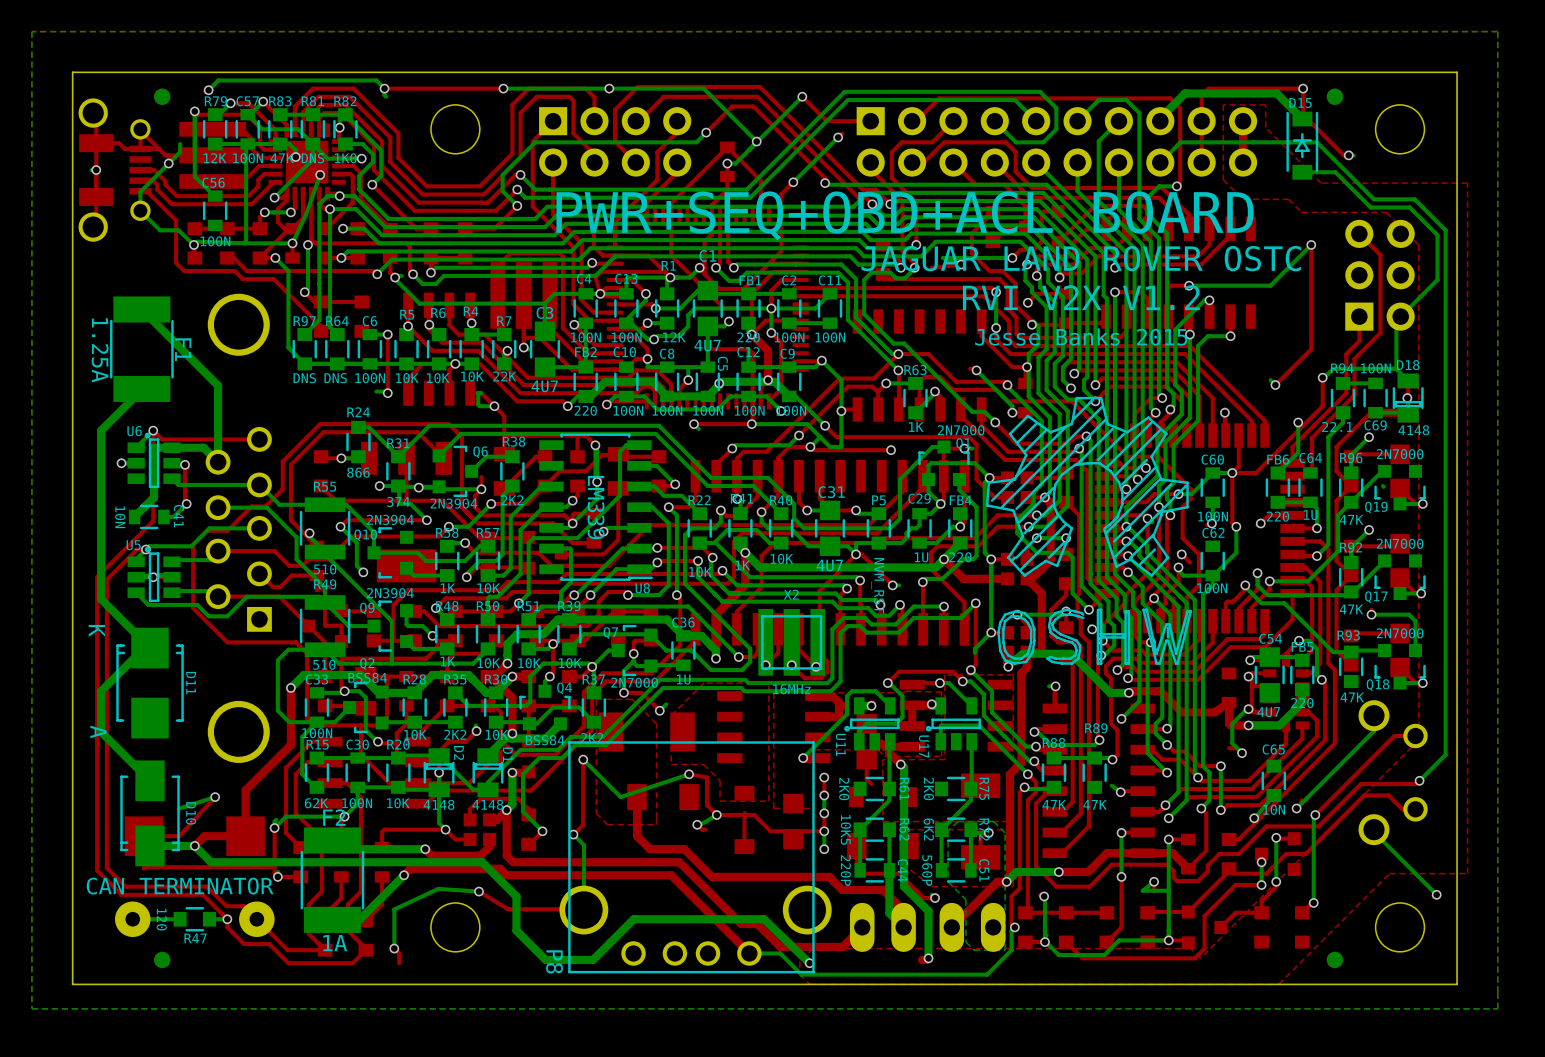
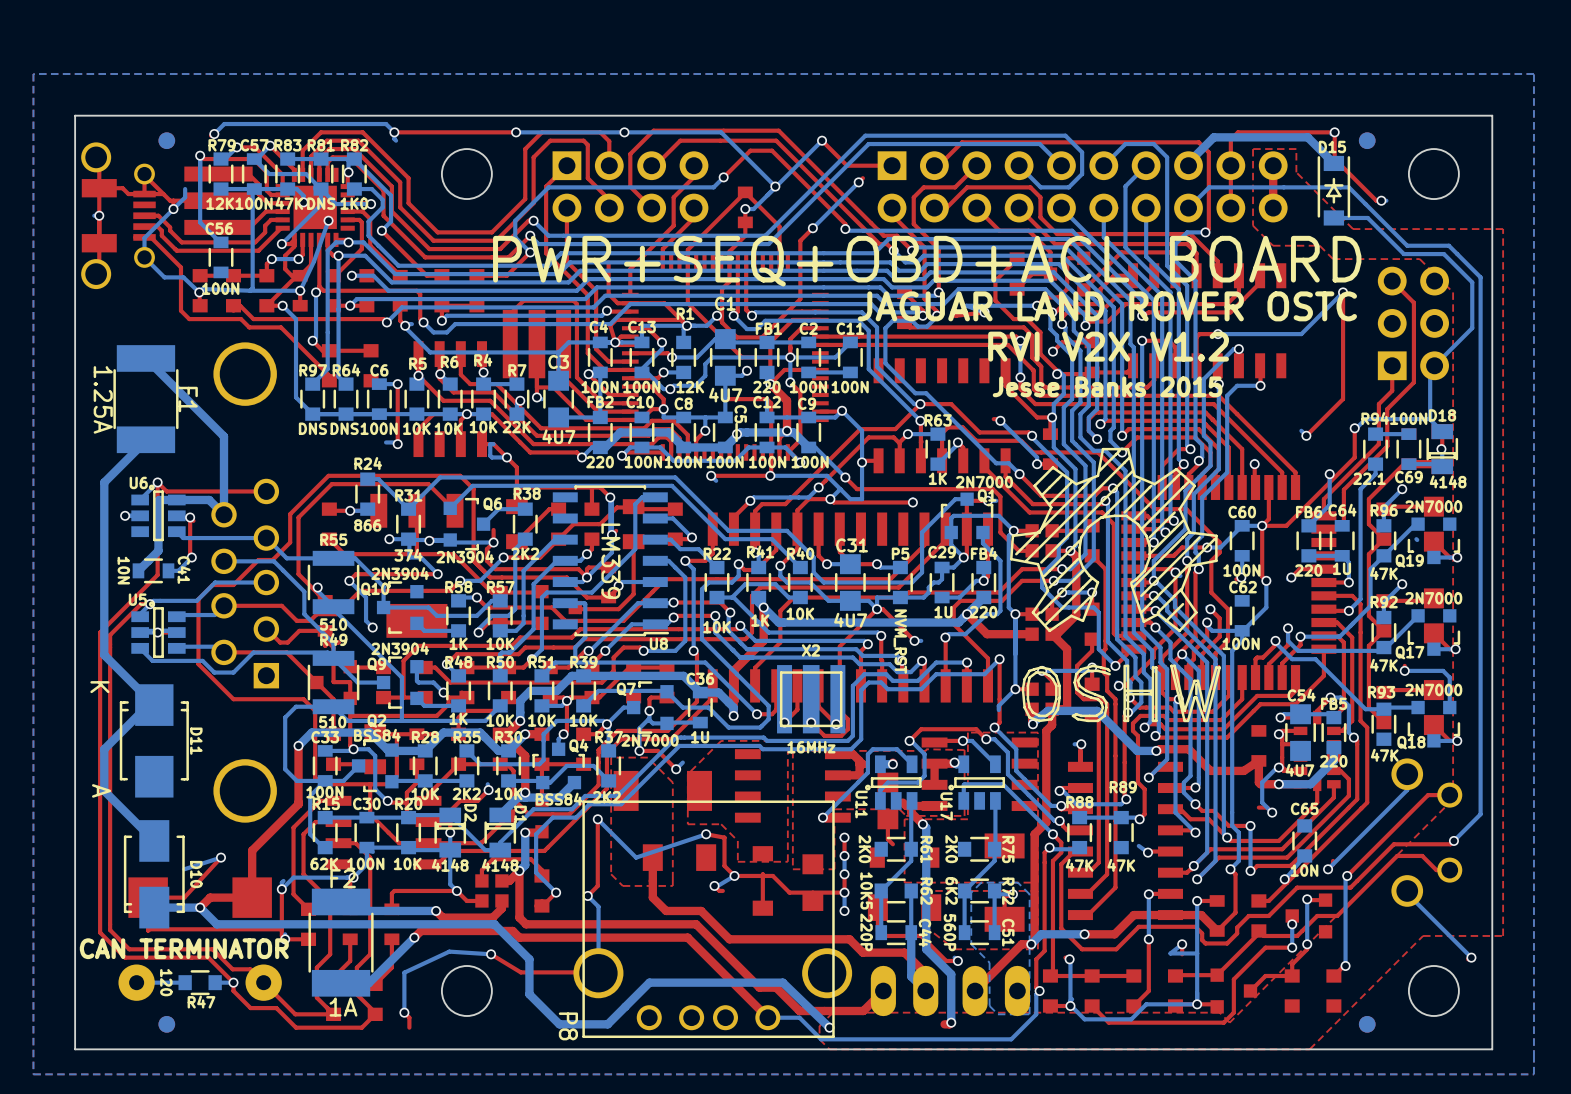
top track: none -> (1218, 617) (1219, 636) (1202, 654)

